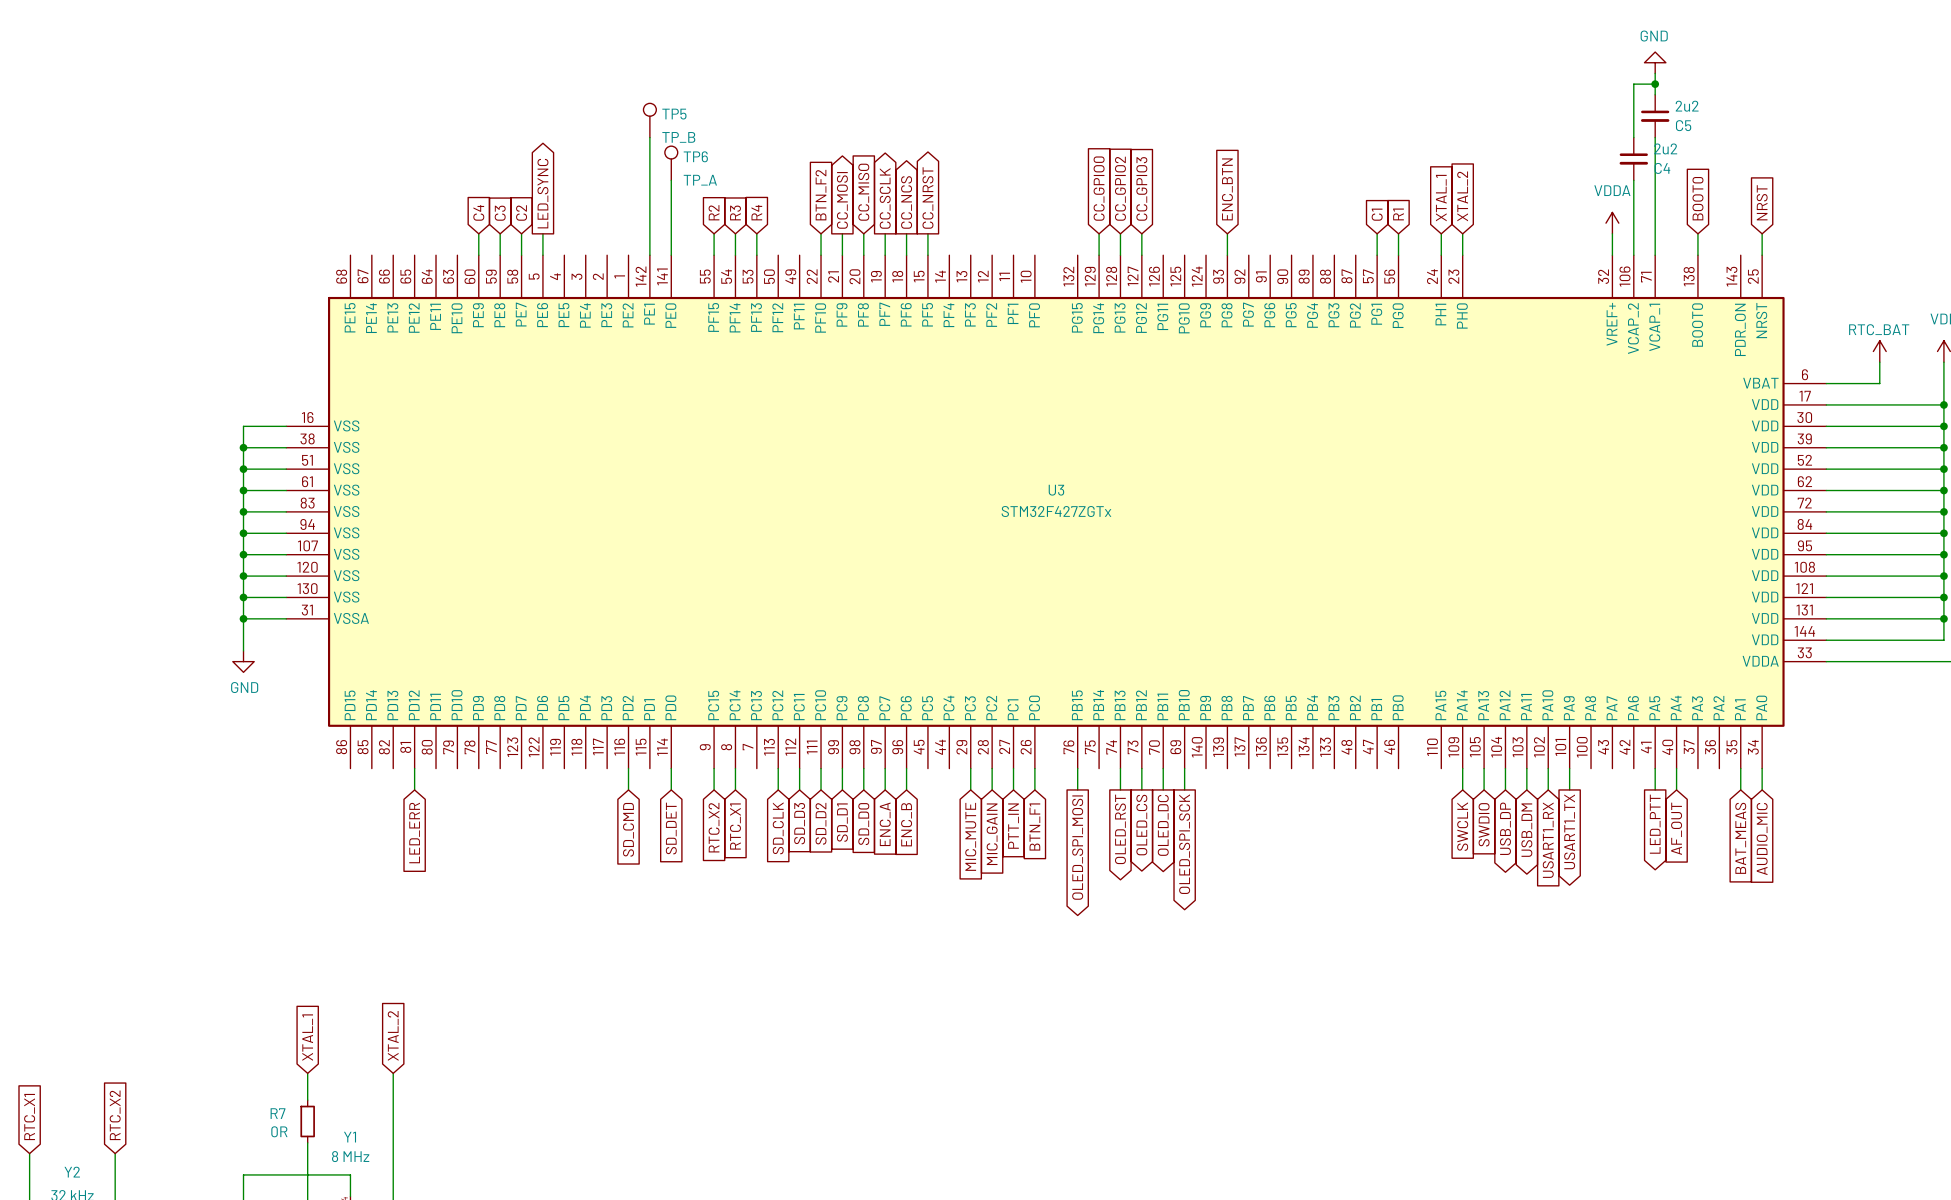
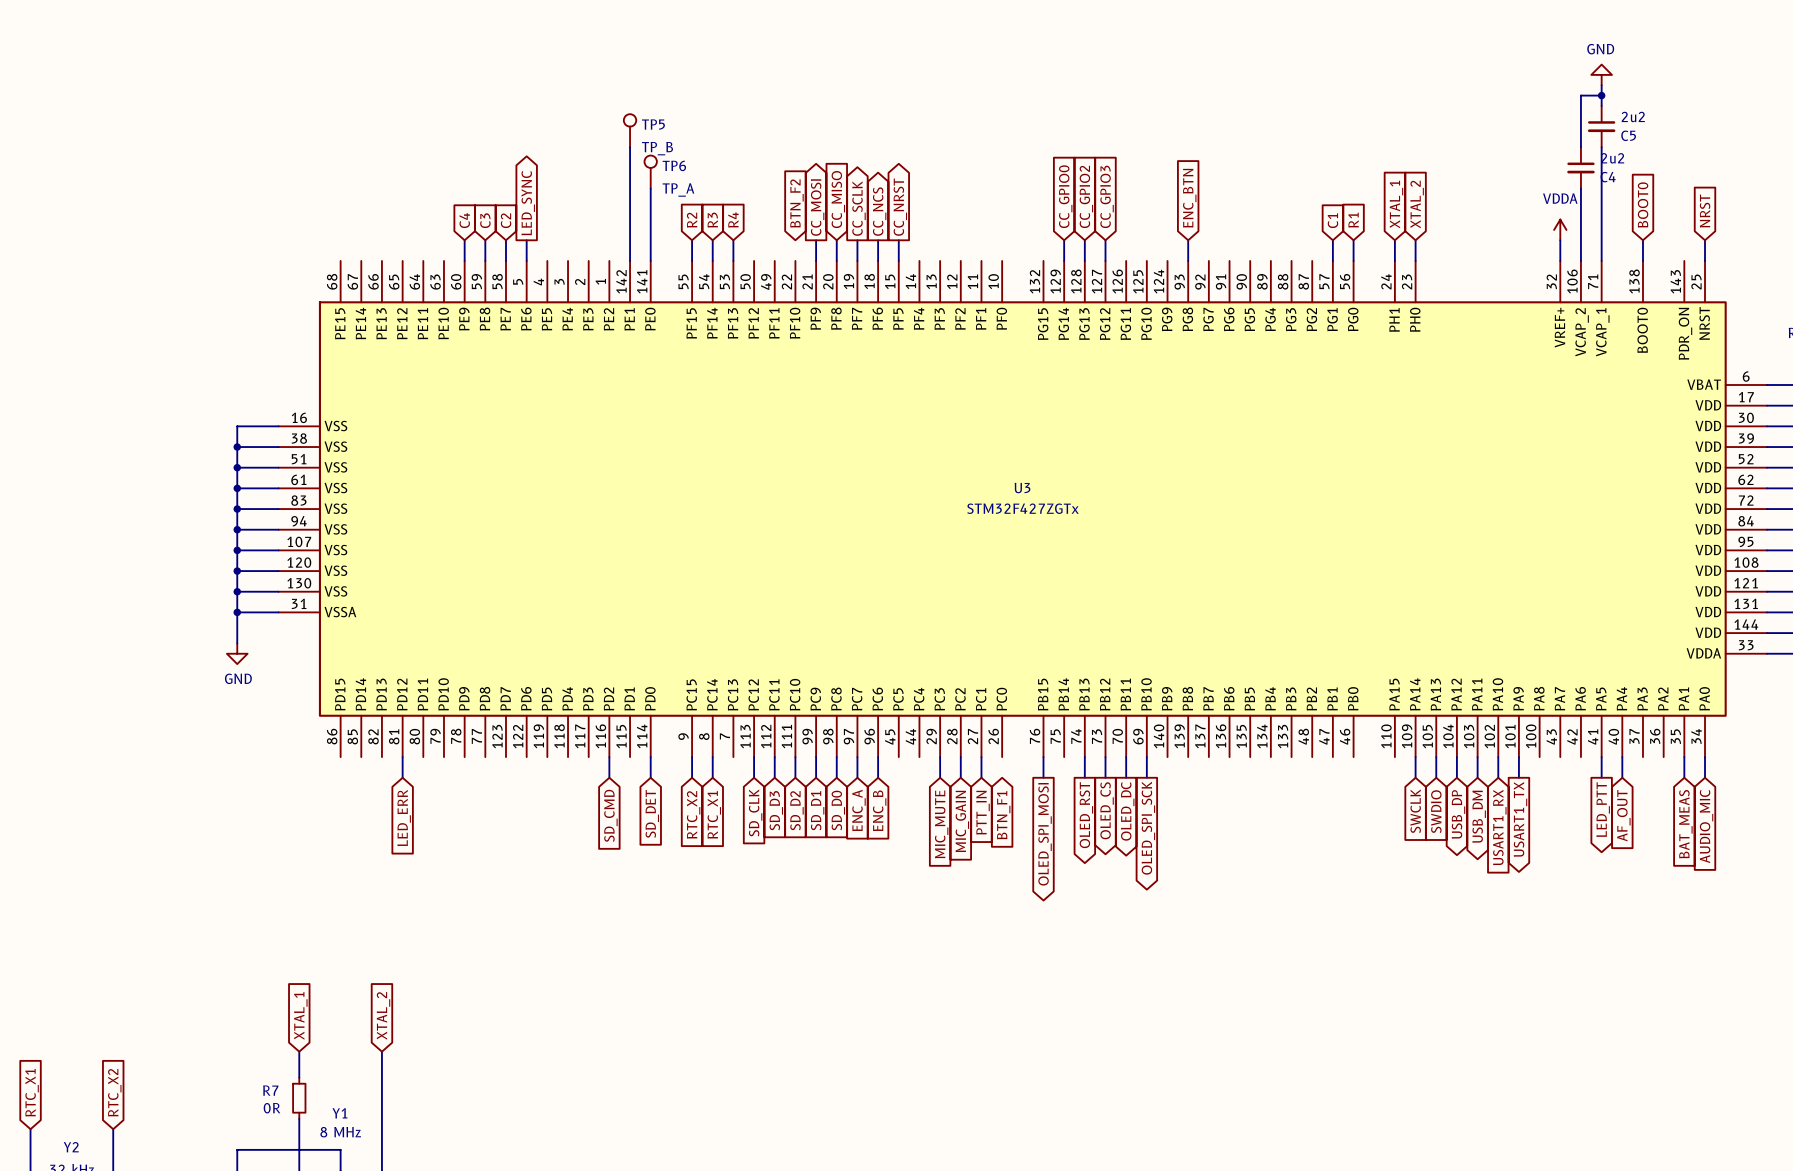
wire: (821, 233) (821, 255) -> none
wire: (1034, 768) (1034, 789) -> none

